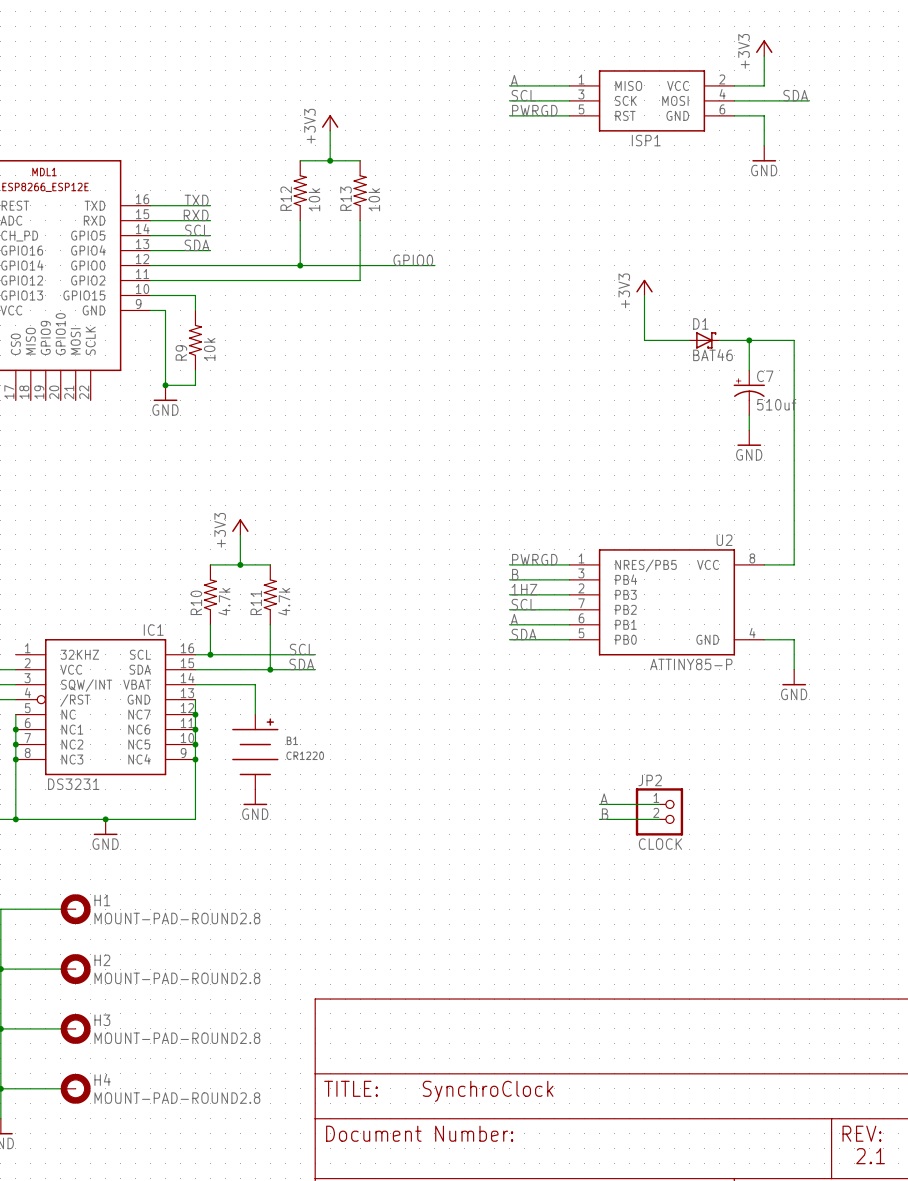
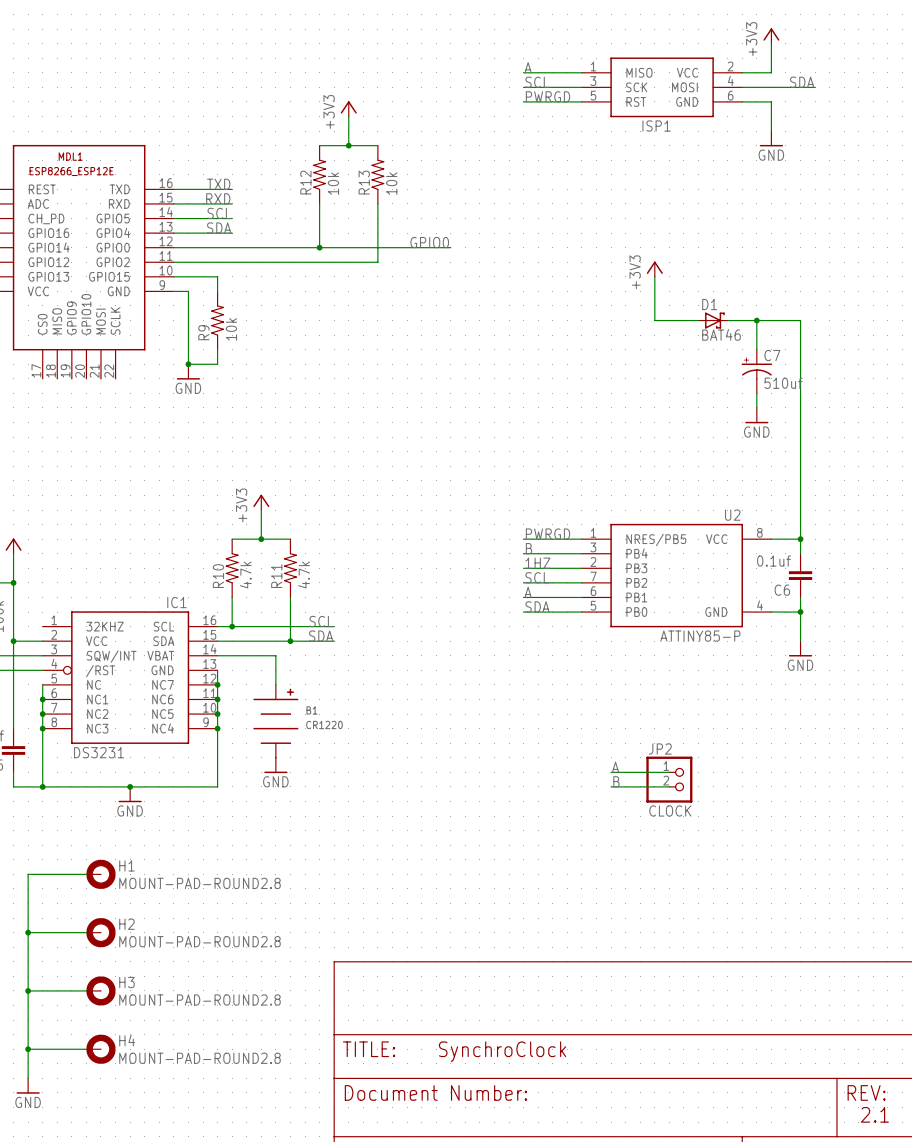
wire: none -> (800, 539) (800, 553)
junction: none -> (800, 539)
C6: none -> 0.1uf (800, 575)
wire: none -> (800, 597) (800, 612)
junction: none -> (800, 612)

